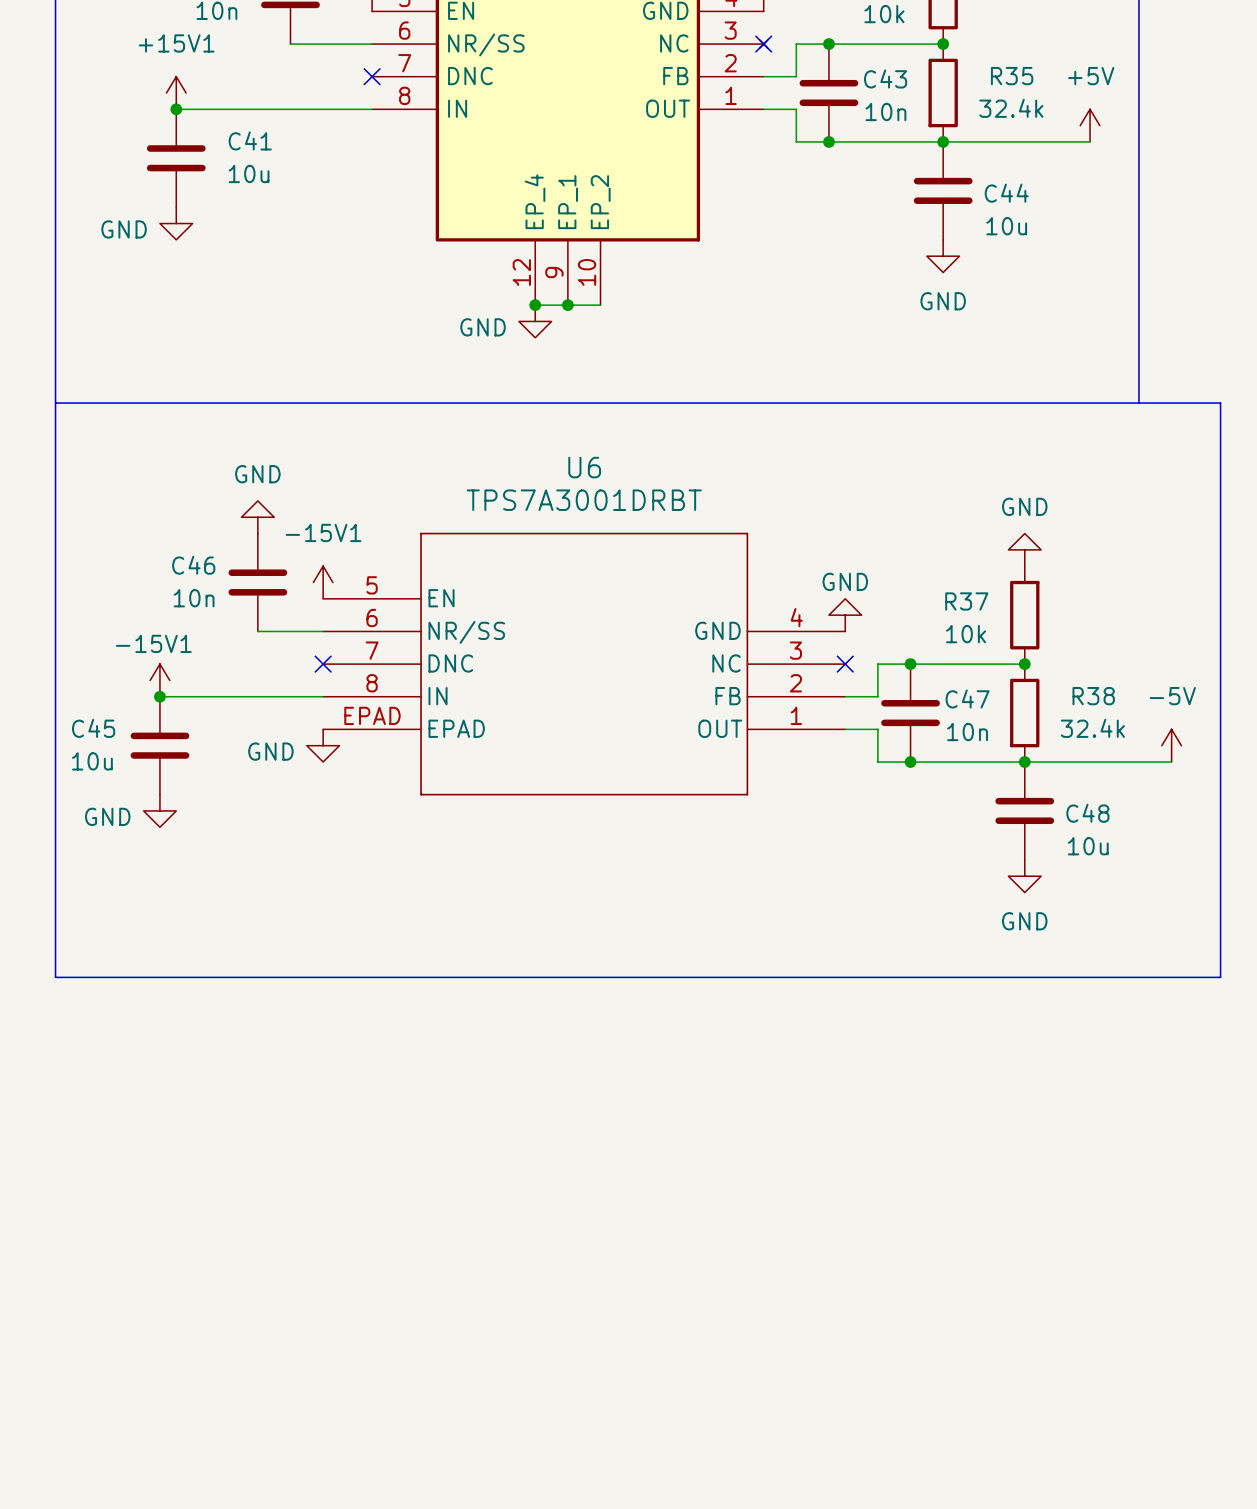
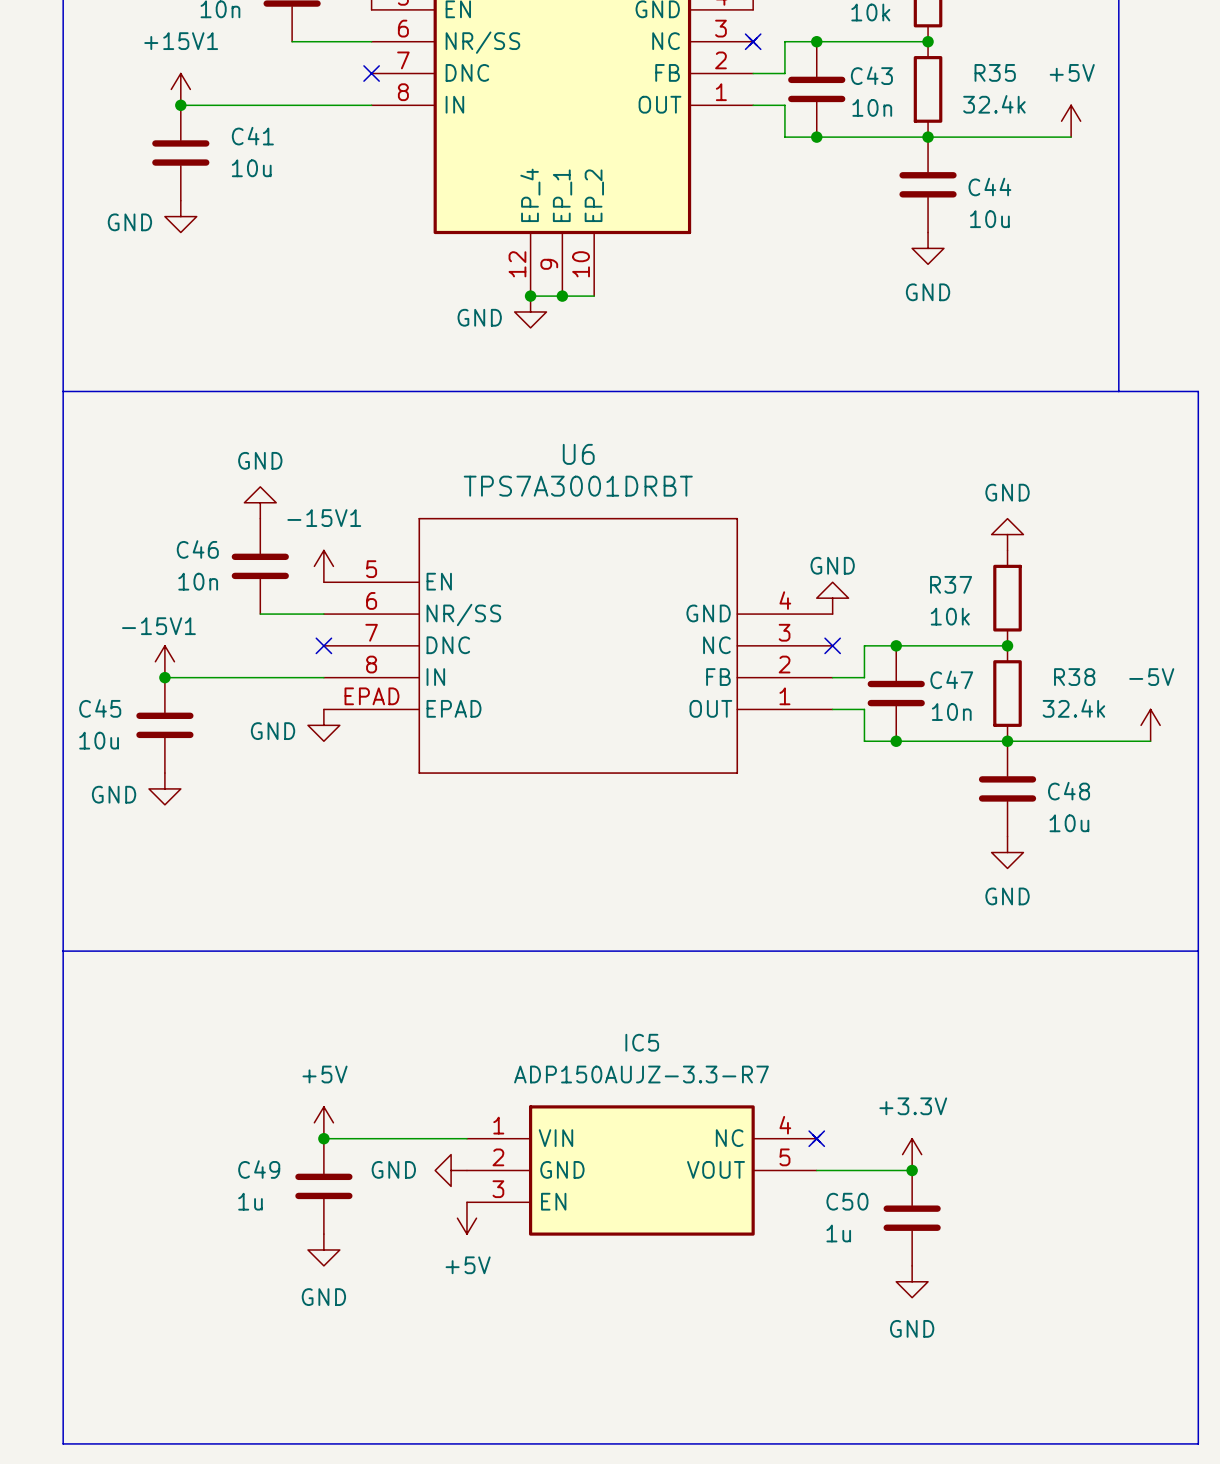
line: none -> (63, 951) (63, 1443) (1198, 1443) (1198, 951)
power symbol: none -> +5V (323, 1122)
wire: none -> (323, 1138) (466, 1138)
junction: none -> (323, 1138)
no-connect mark: none -> (816, 1138)
power symbol: none -> +3.3V (912, 1154)
power symbol: none -> GND (451, 1170)
IC5: none -> ADP150AUJZ-3.3-R7 (643, 1170)
wire: none -> (816, 1170) (912, 1170)
junction: none -> (912, 1170)
C49: none -> 1u (323, 1186)
power symbol: none -> +5V (466, 1218)
C50: none -> 1u (912, 1218)
power symbol: none -> GND (323, 1249)
power symbol: none -> GND (912, 1281)

